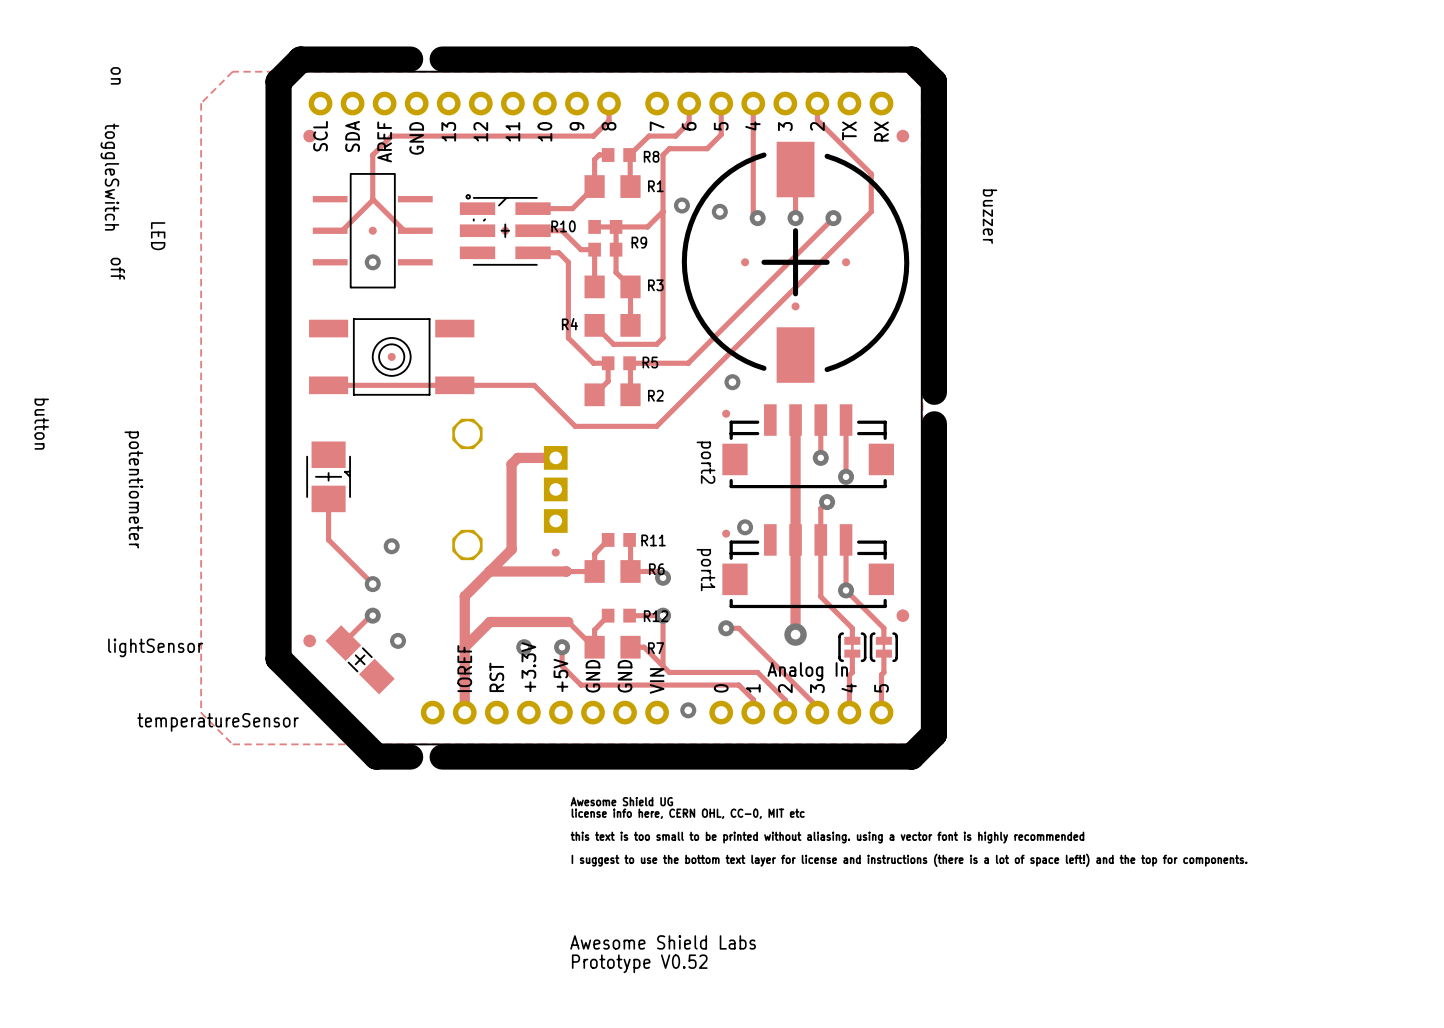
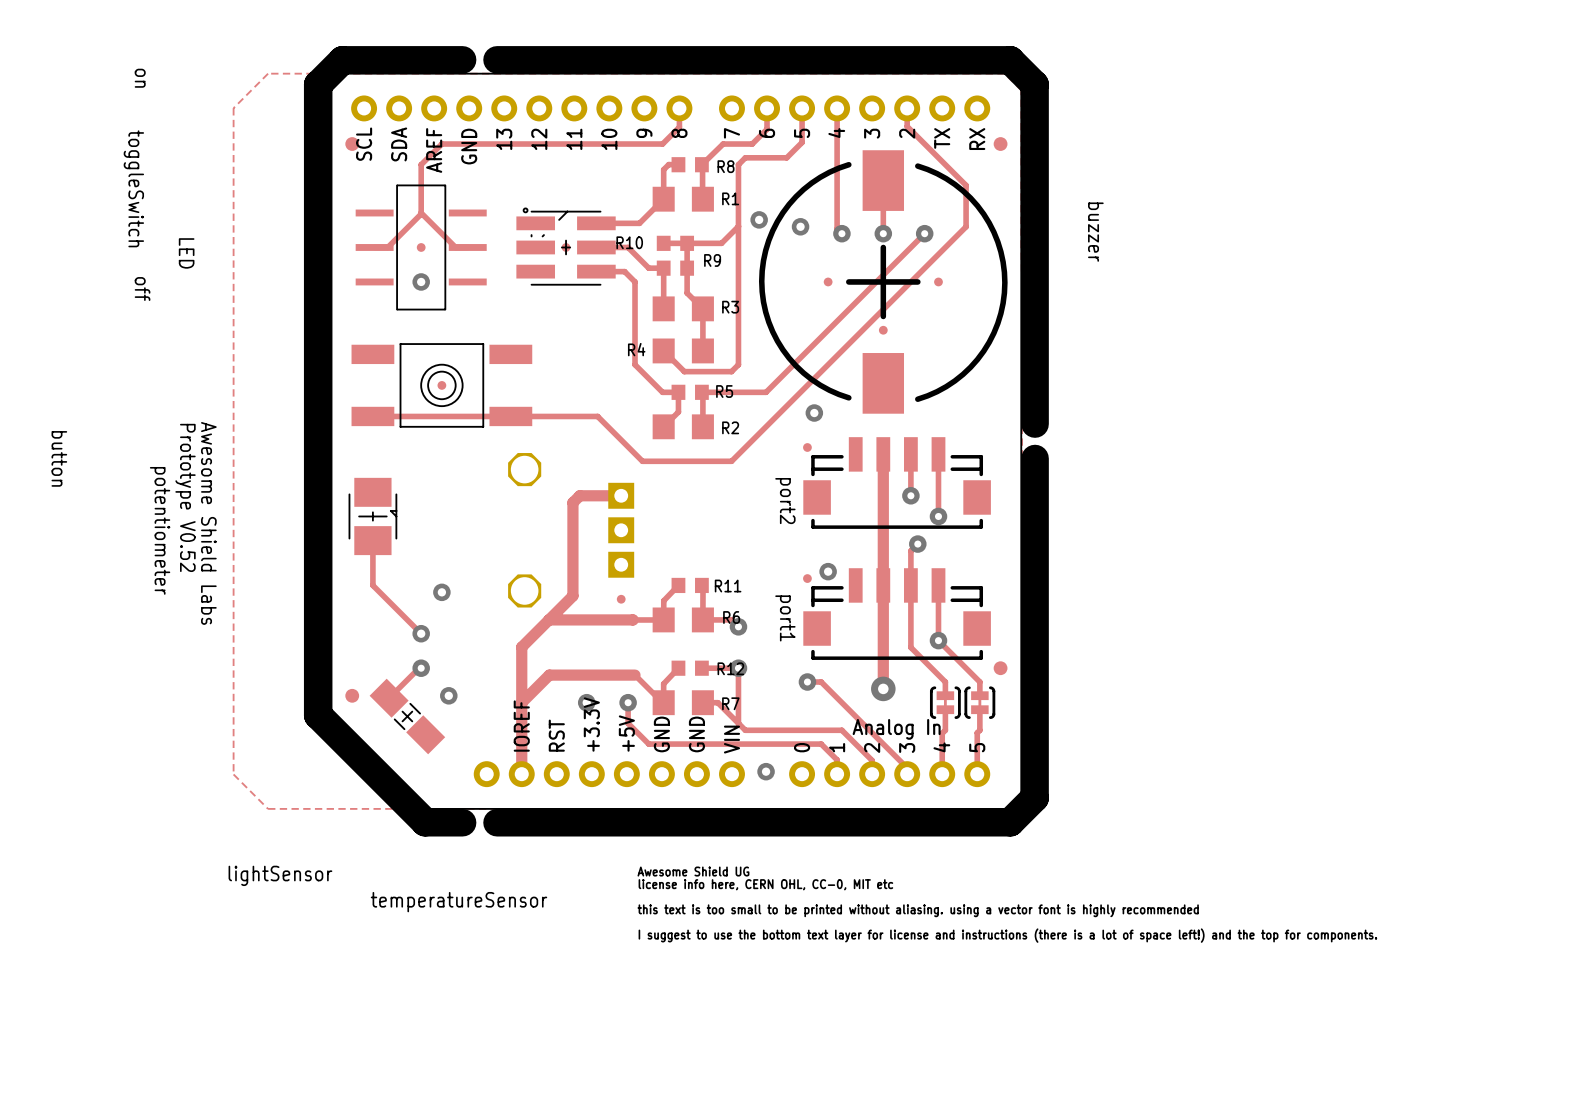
text: none -> Prototype V0.52 (185, 497)
text: none -> Awesome Shield Labs (208, 523)
text position: lightSensor (155, 647) -> lightSensor (280, 875)
text position: temperatureSensor (218, 722) -> temperatureSensor (458, 902)
text: Awesome Shield Labs (663, 942) -> none
text: Prototype V0.52 (639, 963) -> none

